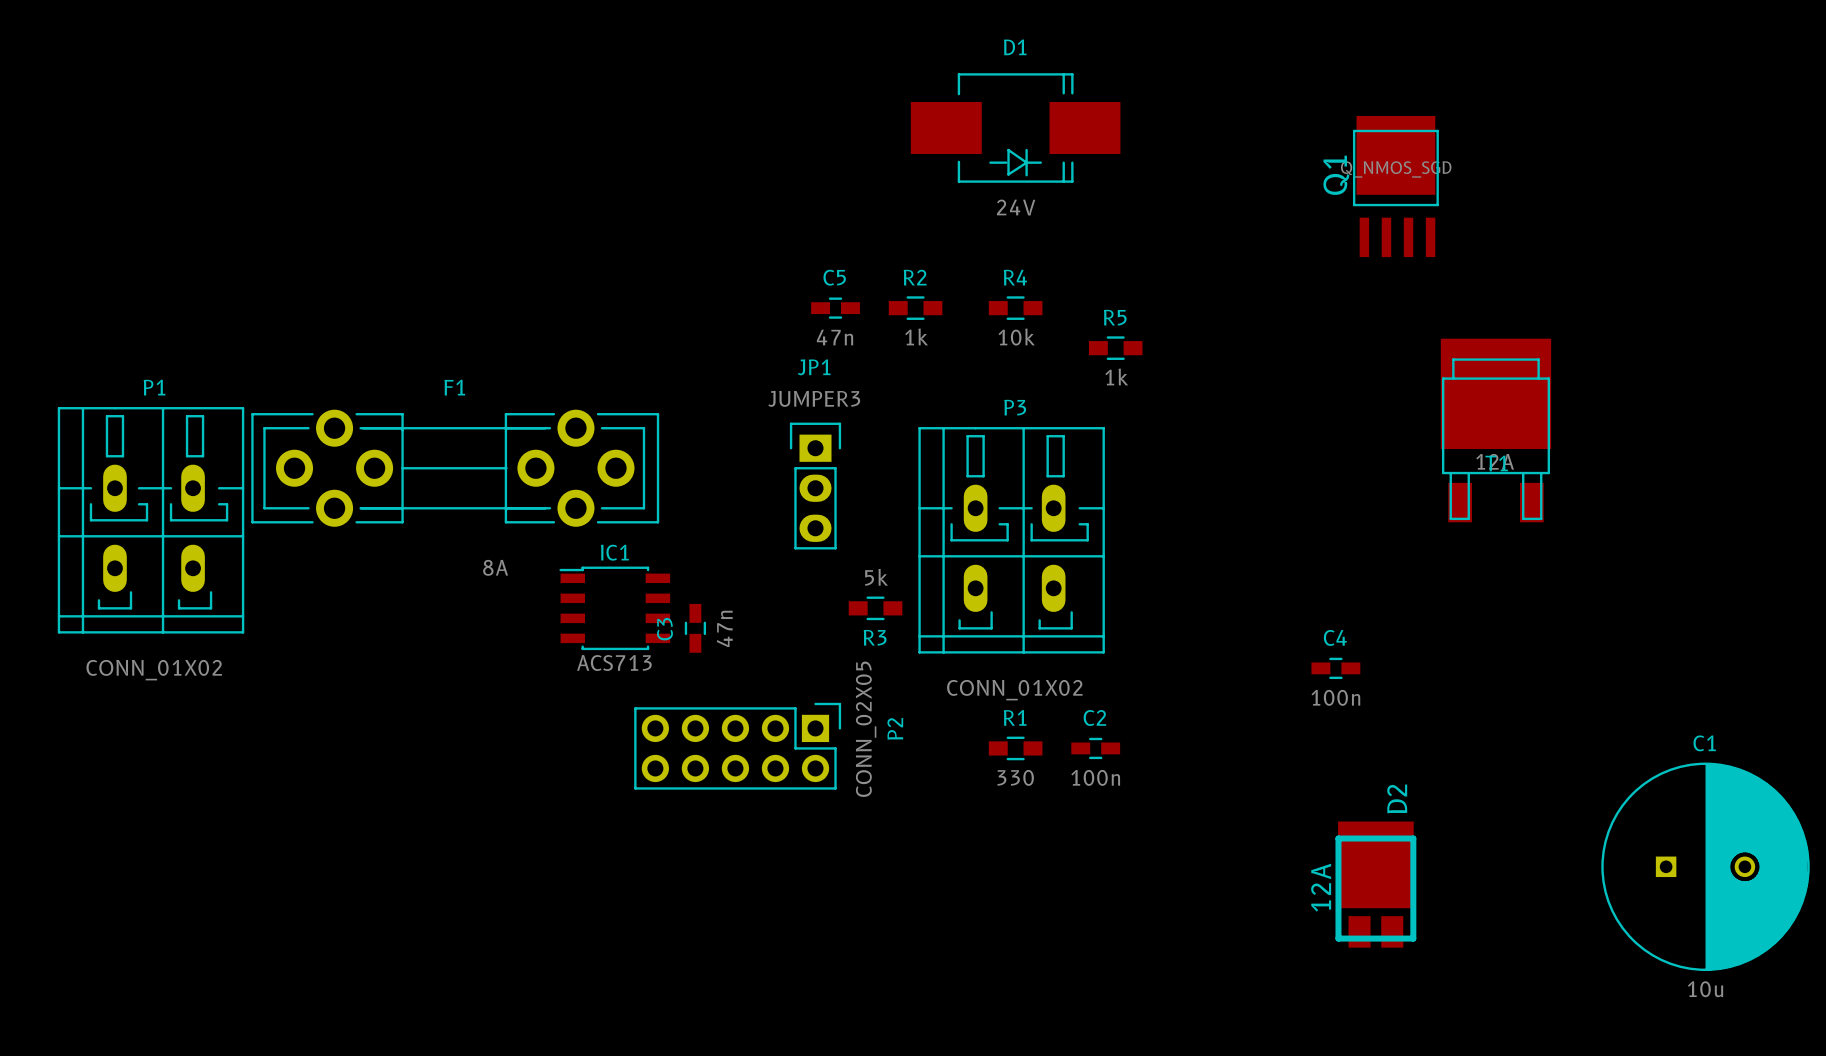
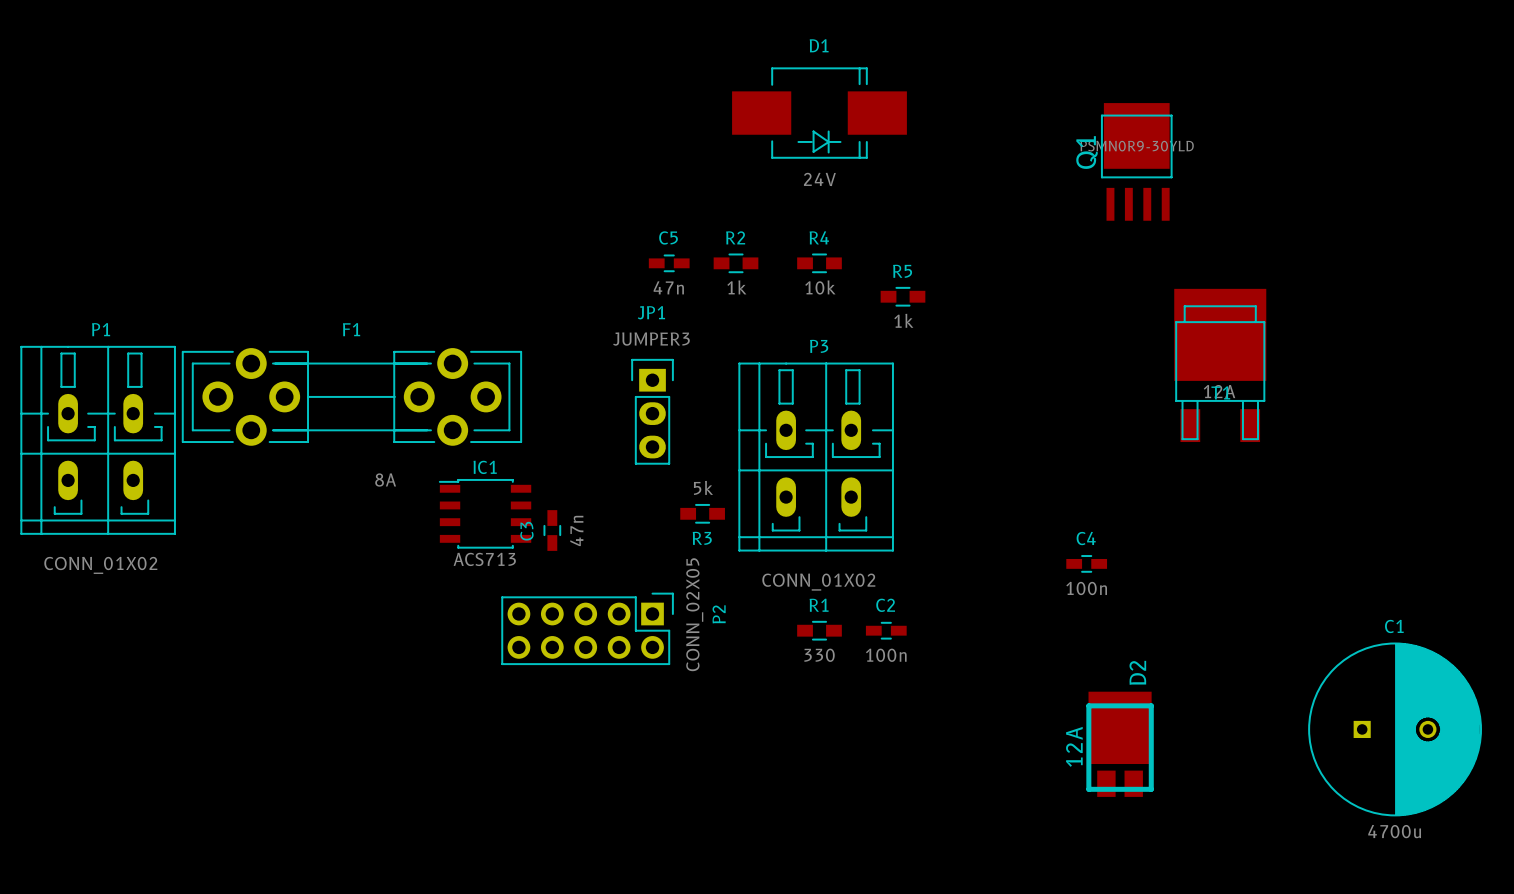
Q1 value: Q_NMOS_SGD (1396, 169) -> PSMN0R9-30YLD (1137, 146)
C1 value: 10u (1705, 989) -> 4700u (1394, 831)

